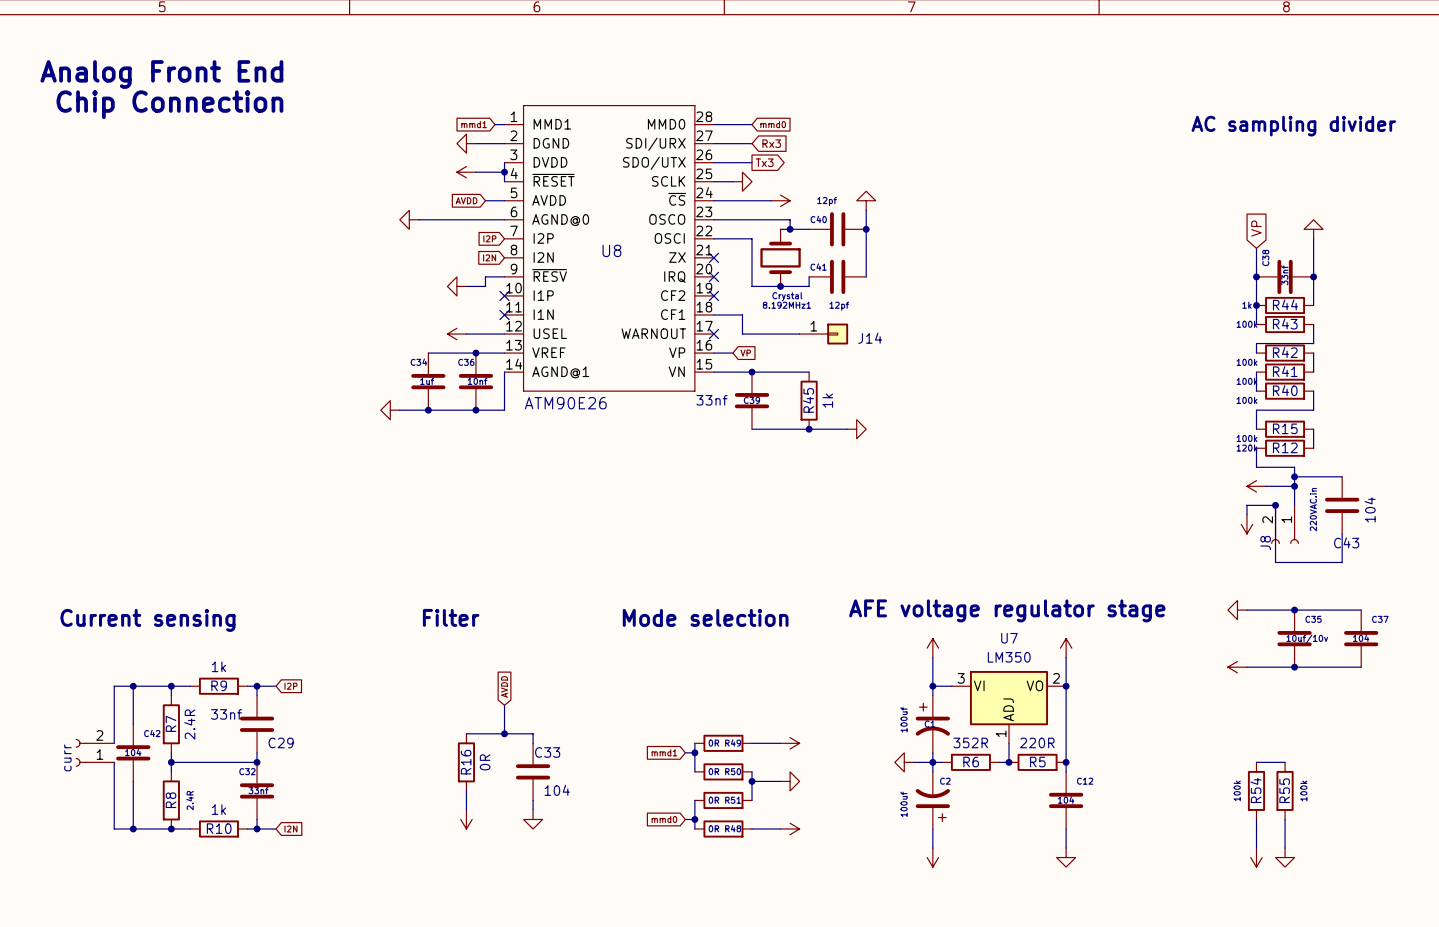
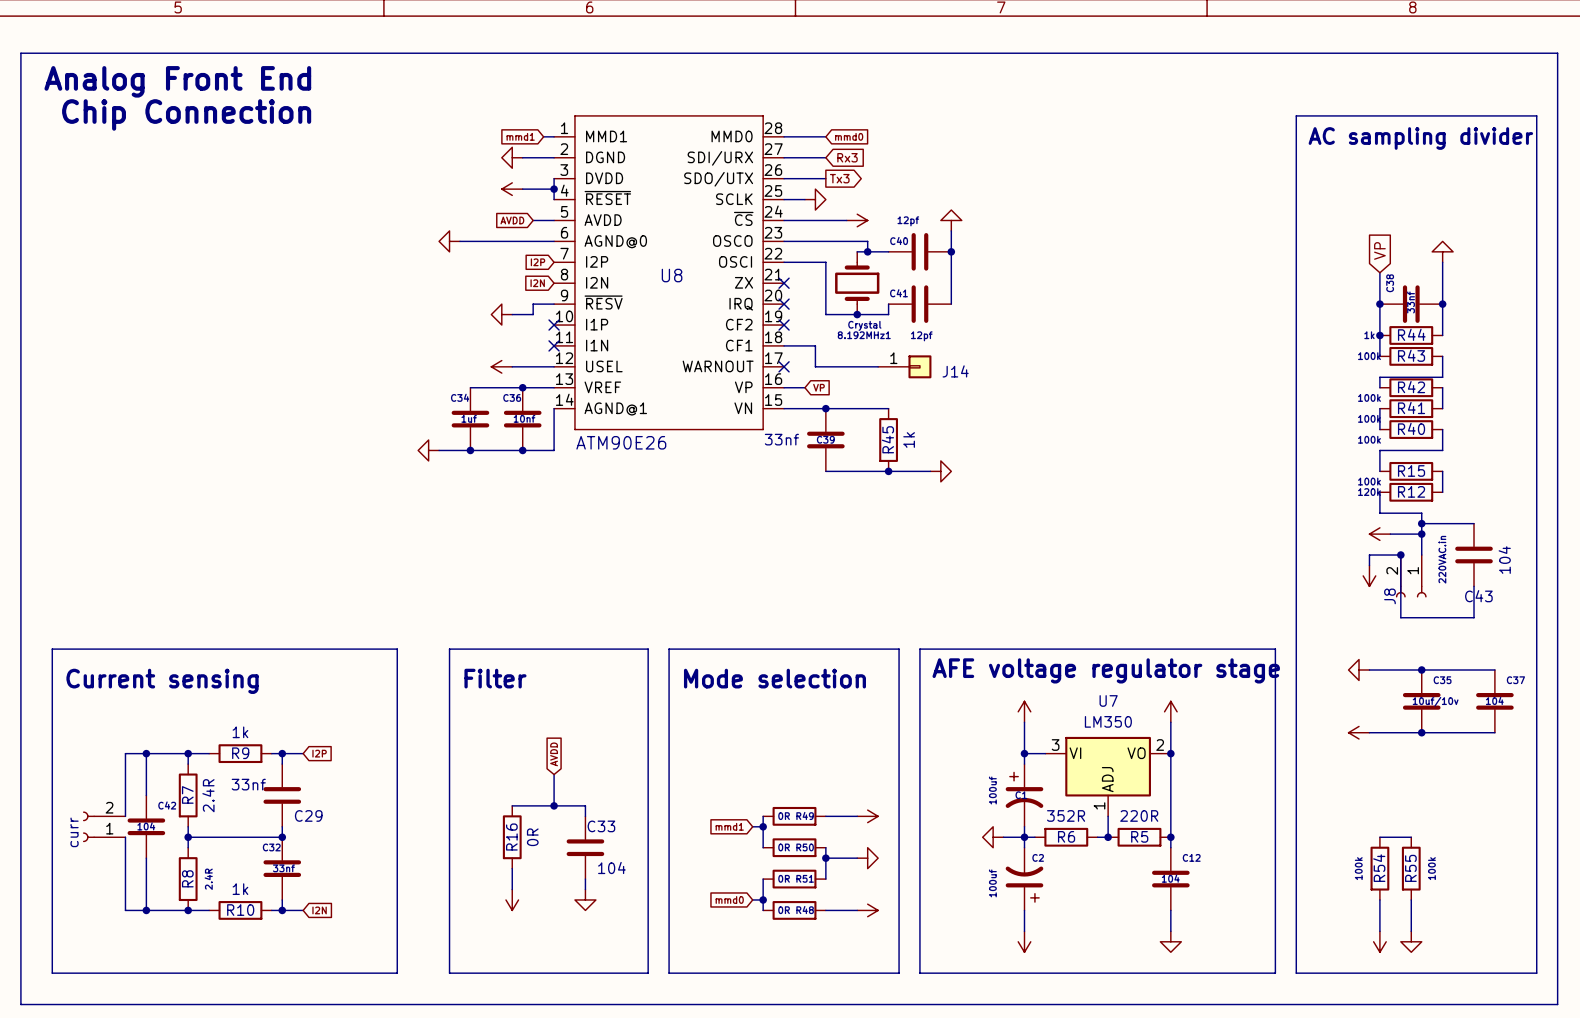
line: none -> (20, 53) (1557, 53) (1557, 1004) (20, 1004) (20, 53)
line: none -> (1296, 115) (1536, 115) (1536, 973) (1296, 973) (1296, 115)
line: none -> (52, 649) (397, 649) (397, 973) (52, 973) (52, 649)
line: none -> (449, 649) (648, 649) (648, 973) (449, 973) (449, 649)
line: none -> (669, 649) (899, 649) (899, 973) (669, 973) (669, 649)
line: none -> (919, 649) (1275, 649) (1275, 973) (919, 973) (919, 649)

